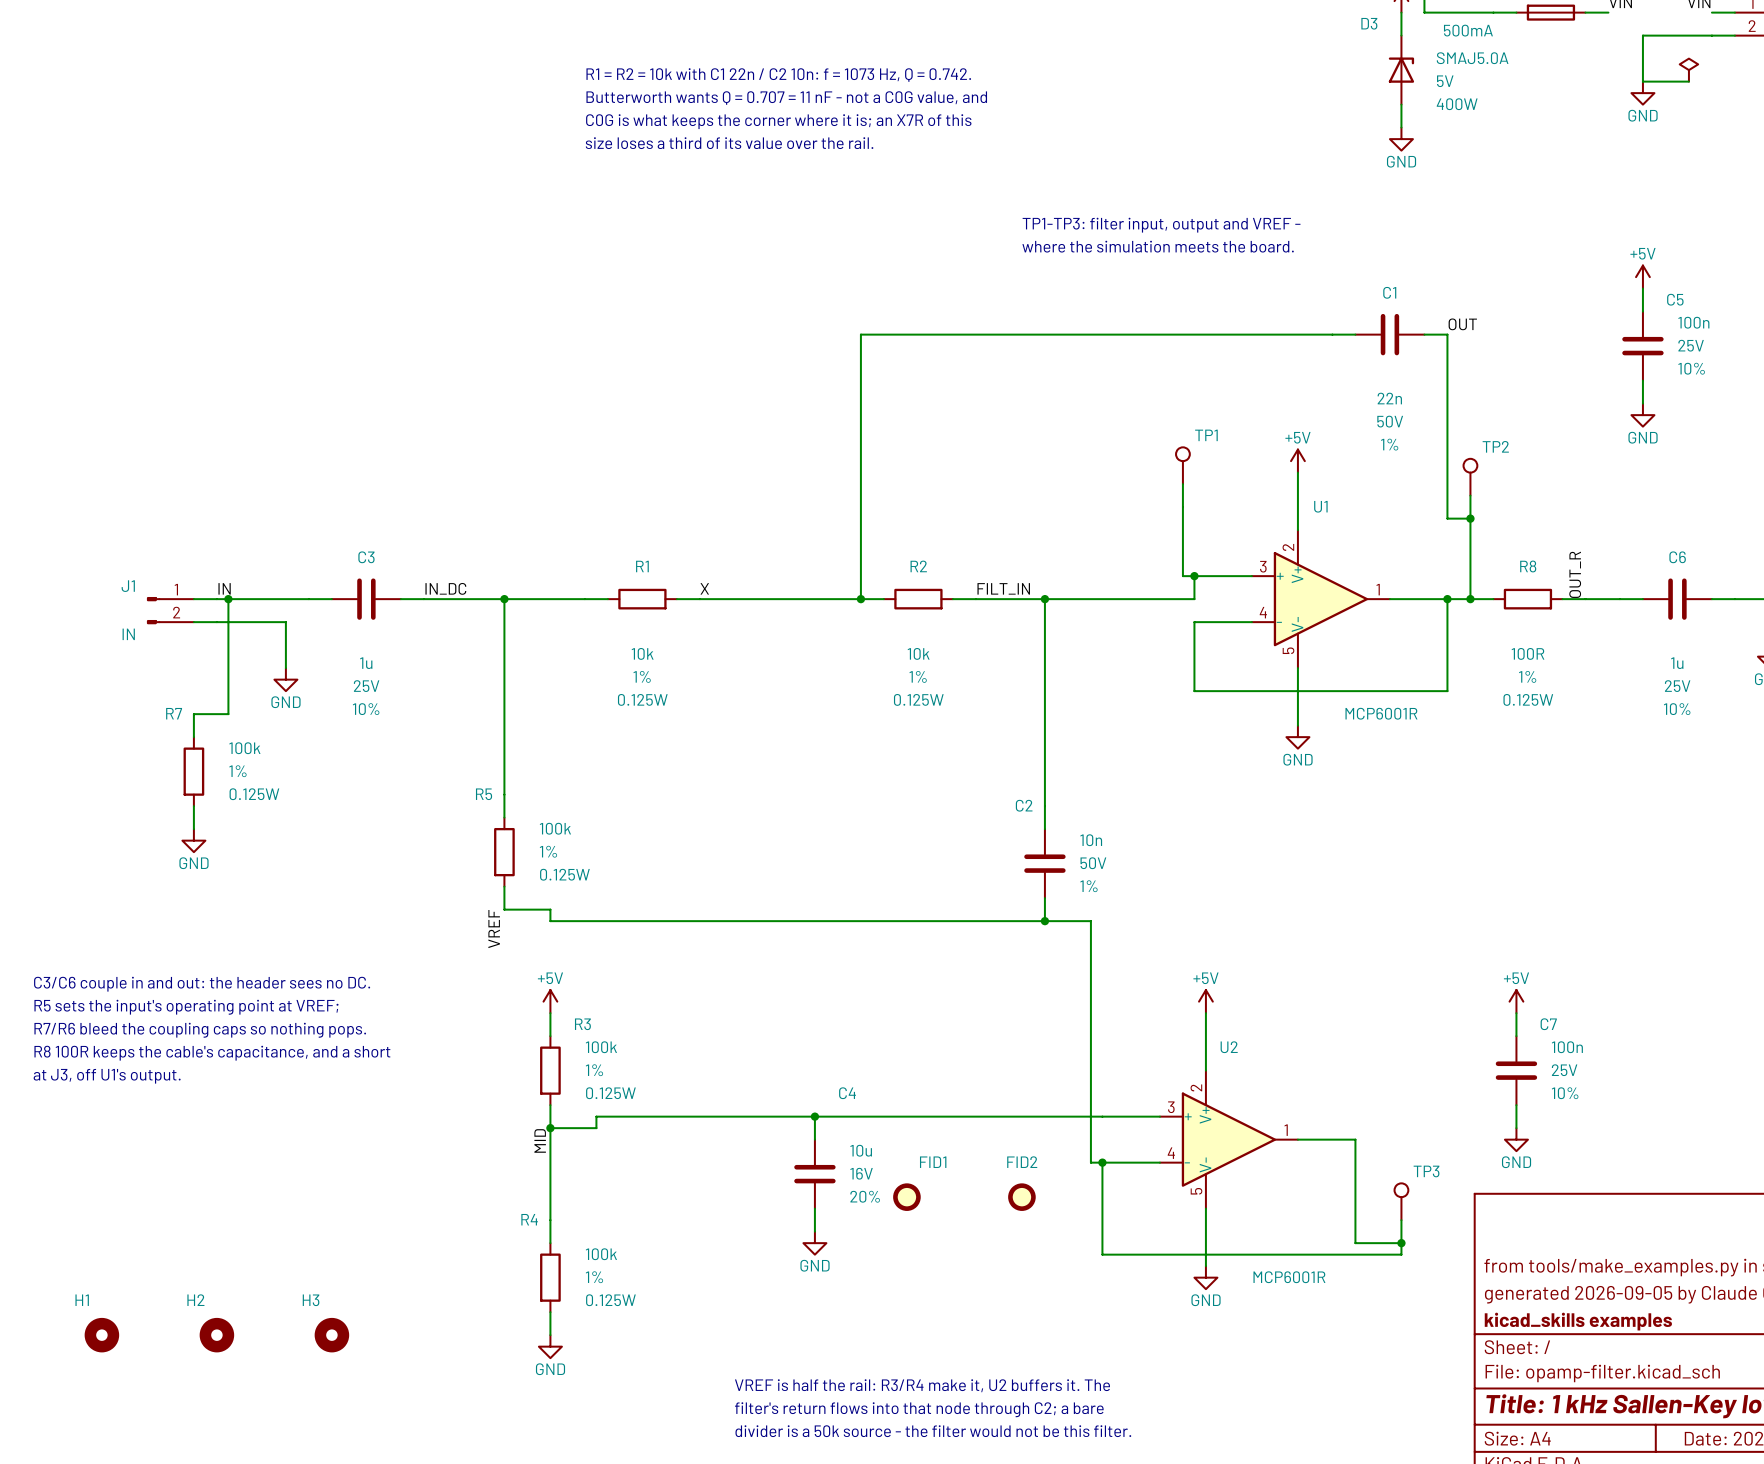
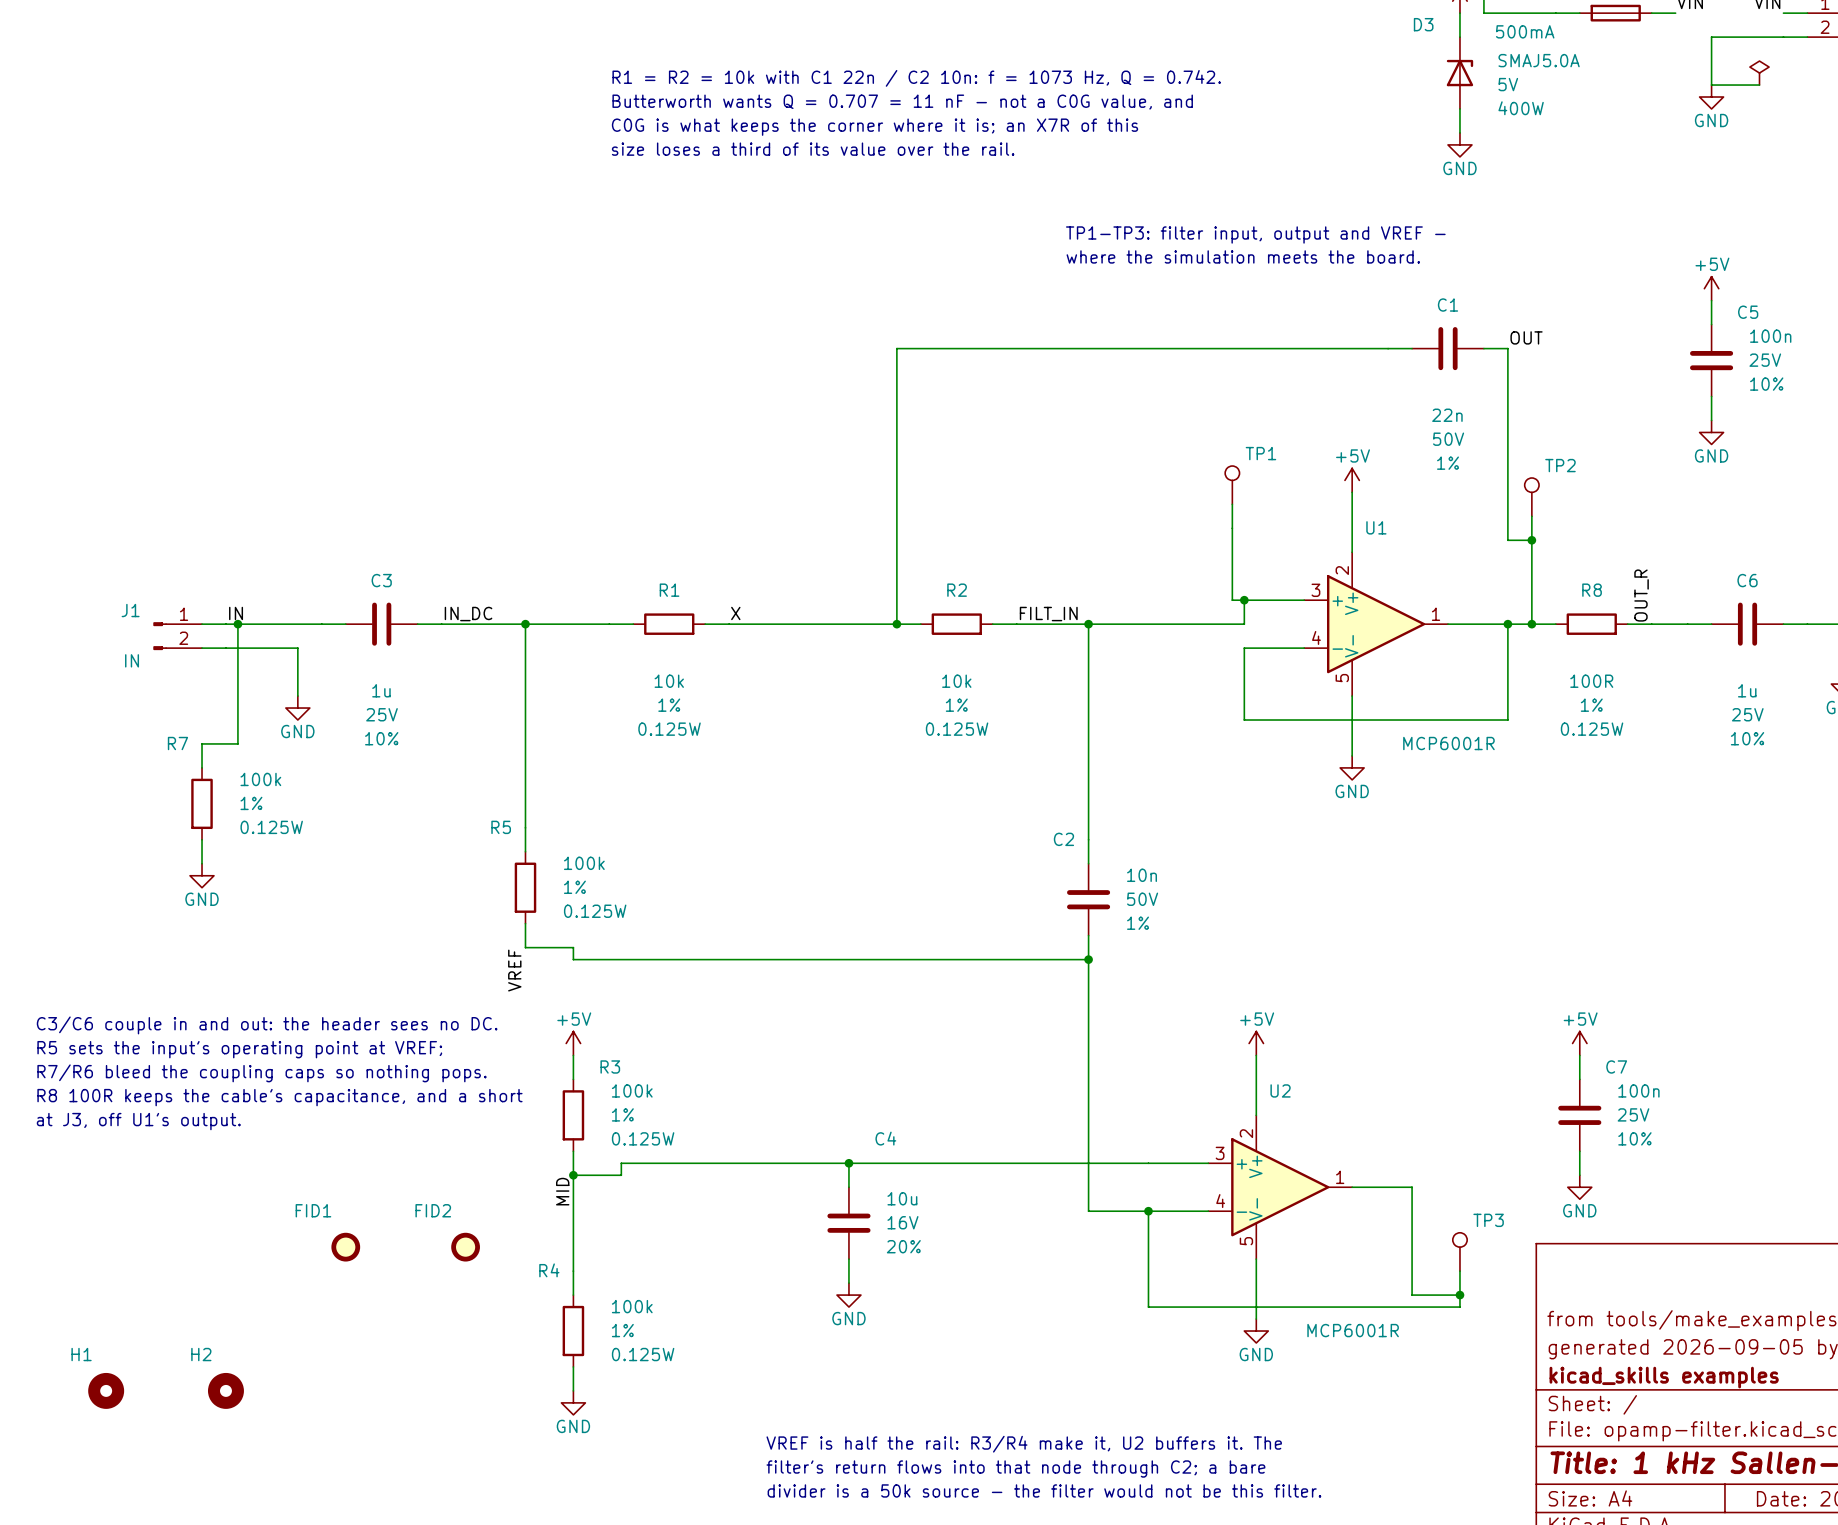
wire: (1044, 921) (1090, 921) (1090, 1162) -> (1088, 959) (1088, 1211) (1136, 1211)
FID1 name position: FID1 (933, 1162) -> FID1 (313, 1210)
FID2 name position: FID2 (1022, 1162) -> FID2 (433, 1210)
FID1 position: (906, 1197) -> (345, 1247)
FID2 position: (1021, 1197) -> (465, 1247)
H3: (331, 1335) -> none

